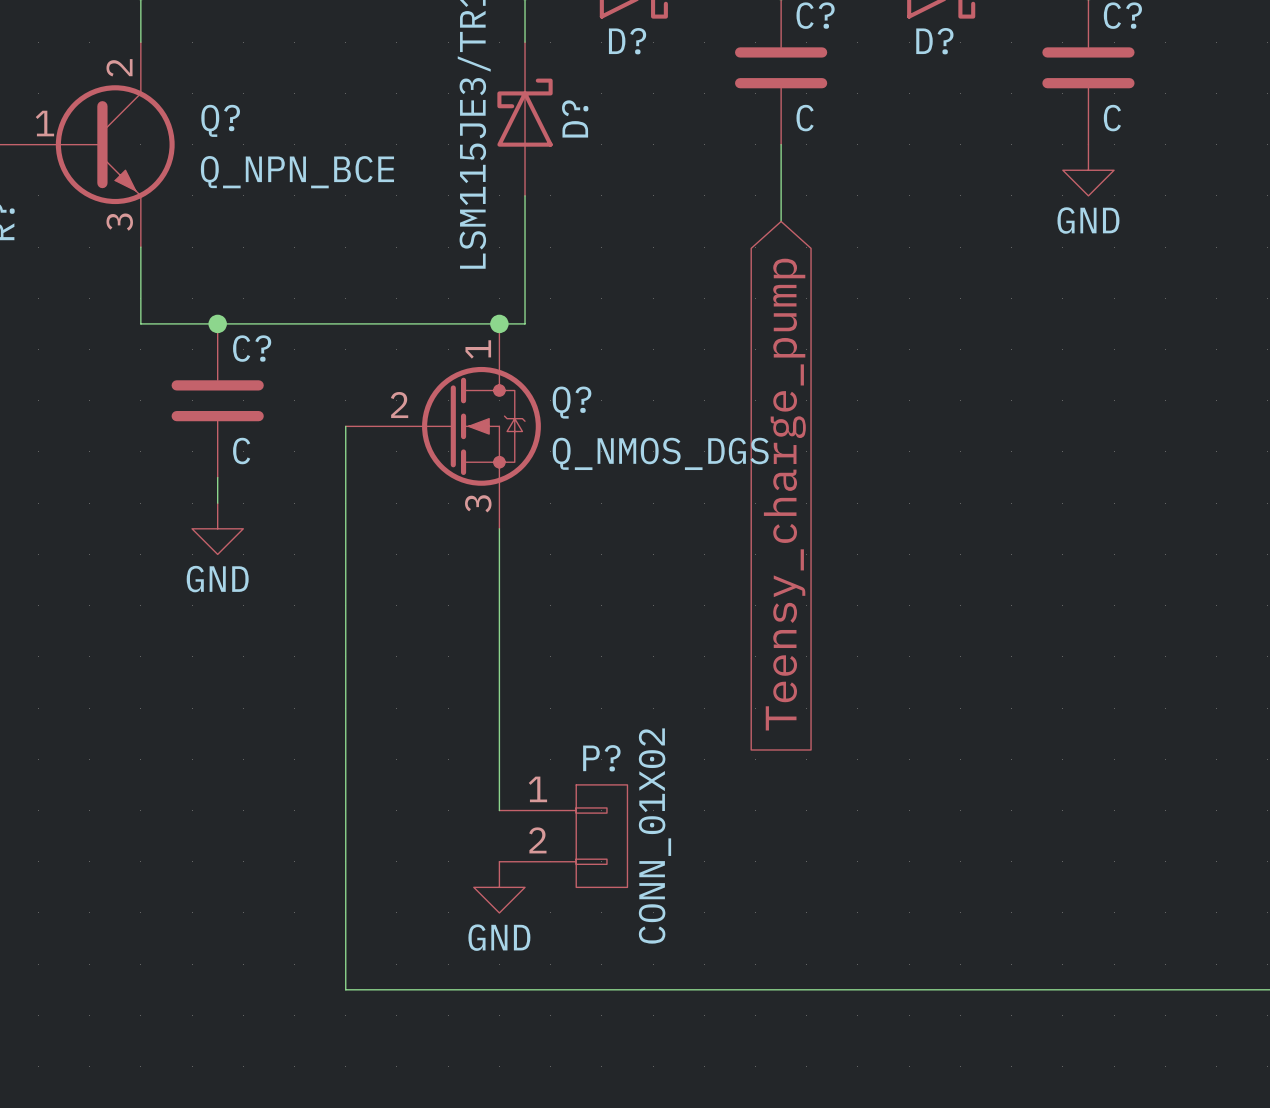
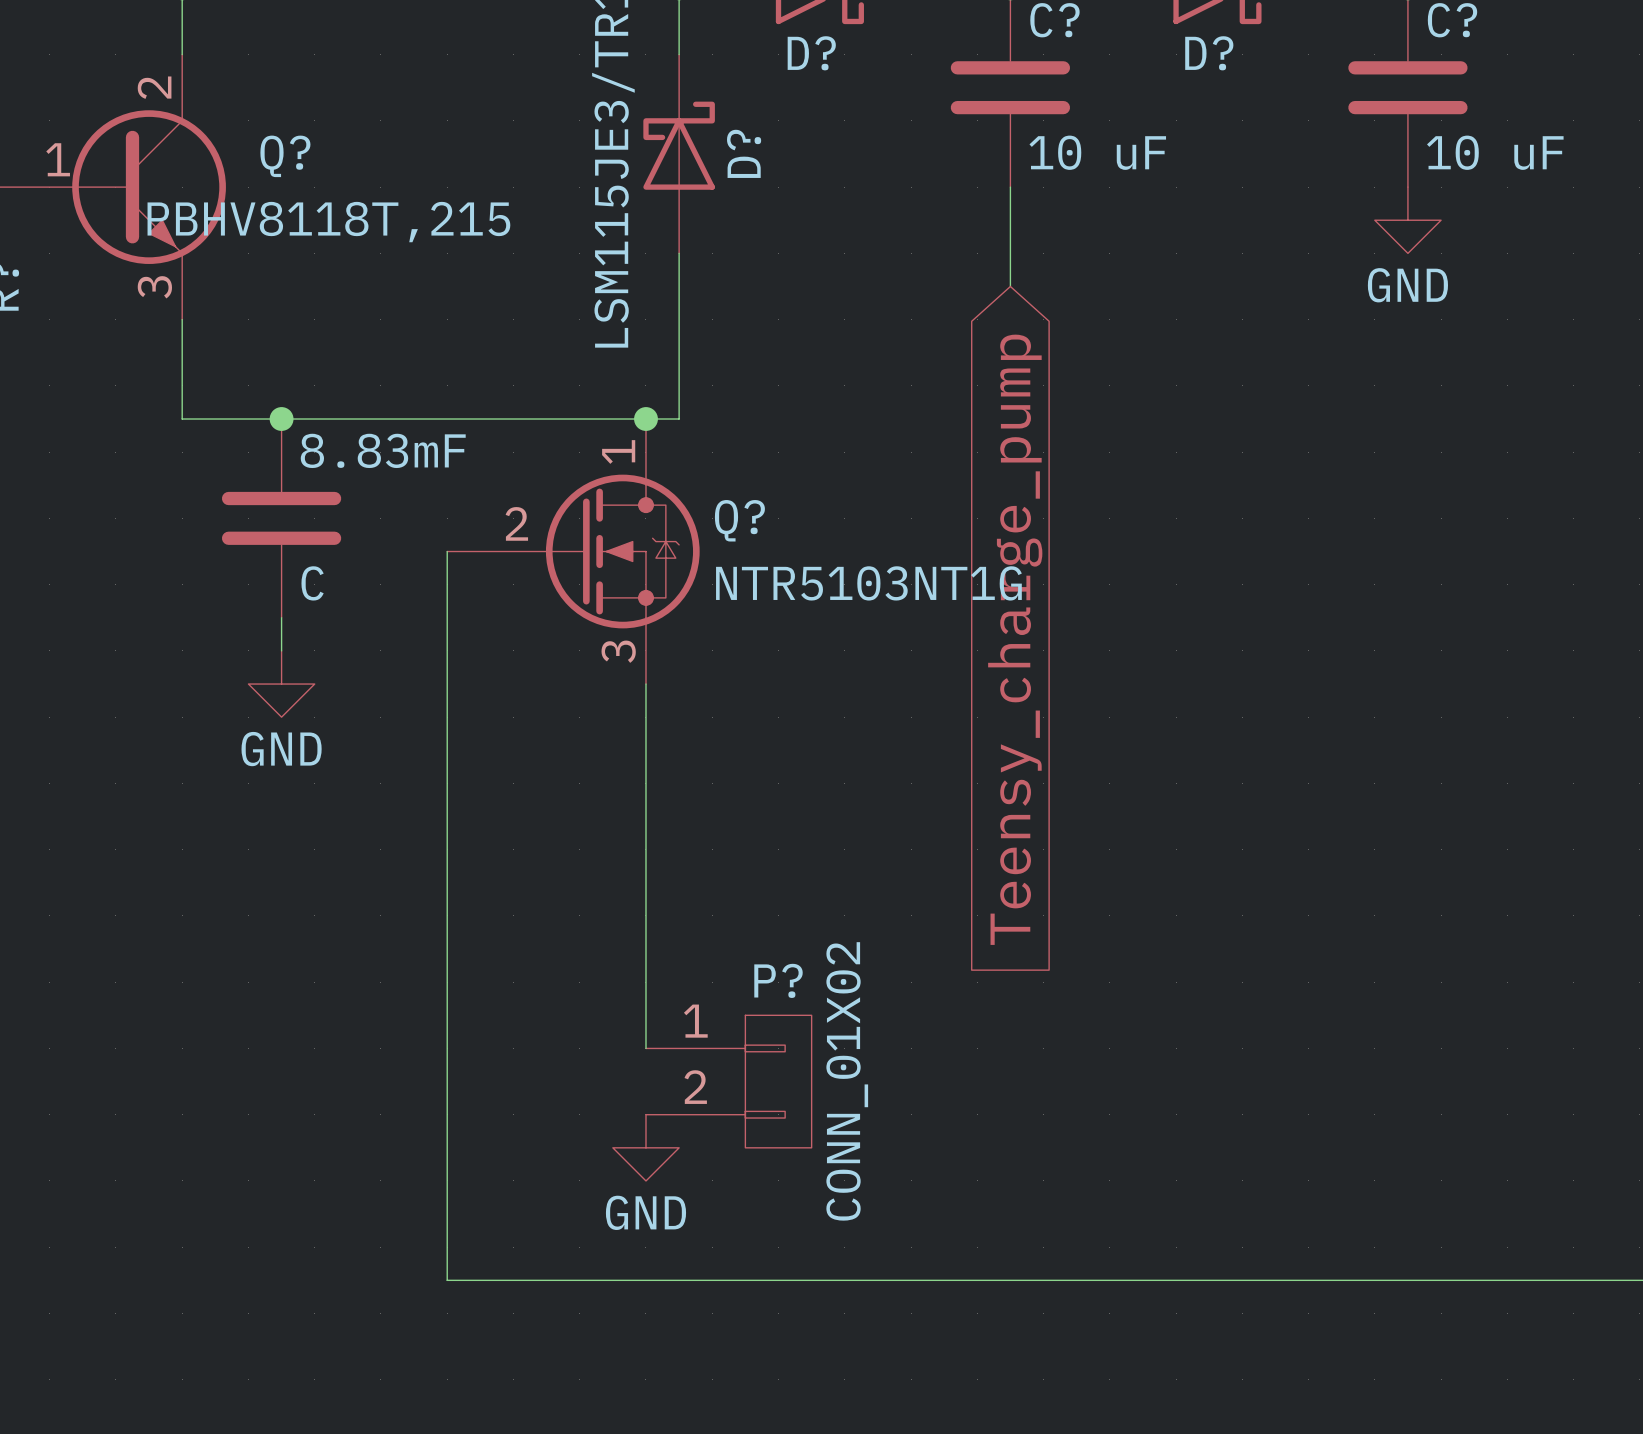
C? value: C (805, 118) -> 10 uF (1097, 152)
C? value: C (1112, 118) -> 10 uF (1495, 152)
Q? value: Q_NPN_BCE (297, 172) -> PBHV8118T,215 (328, 222)
C? name: C? (252, 348) -> 8.83mF (383, 450)
Q? value: Q_NMOS_DGS (660, 453) -> NTR5103NT1G (868, 583)

